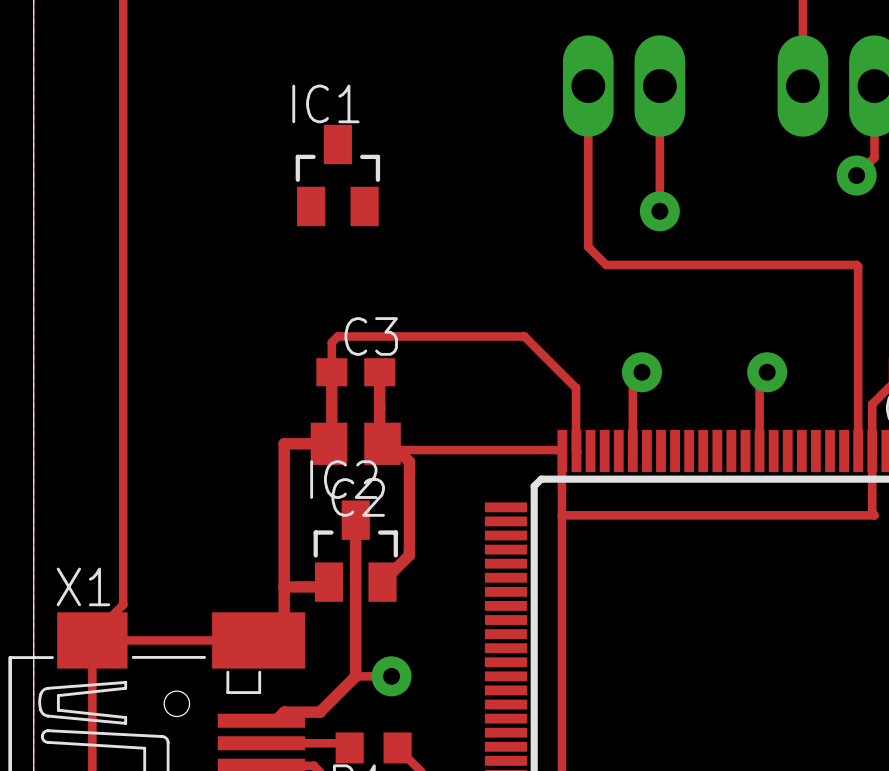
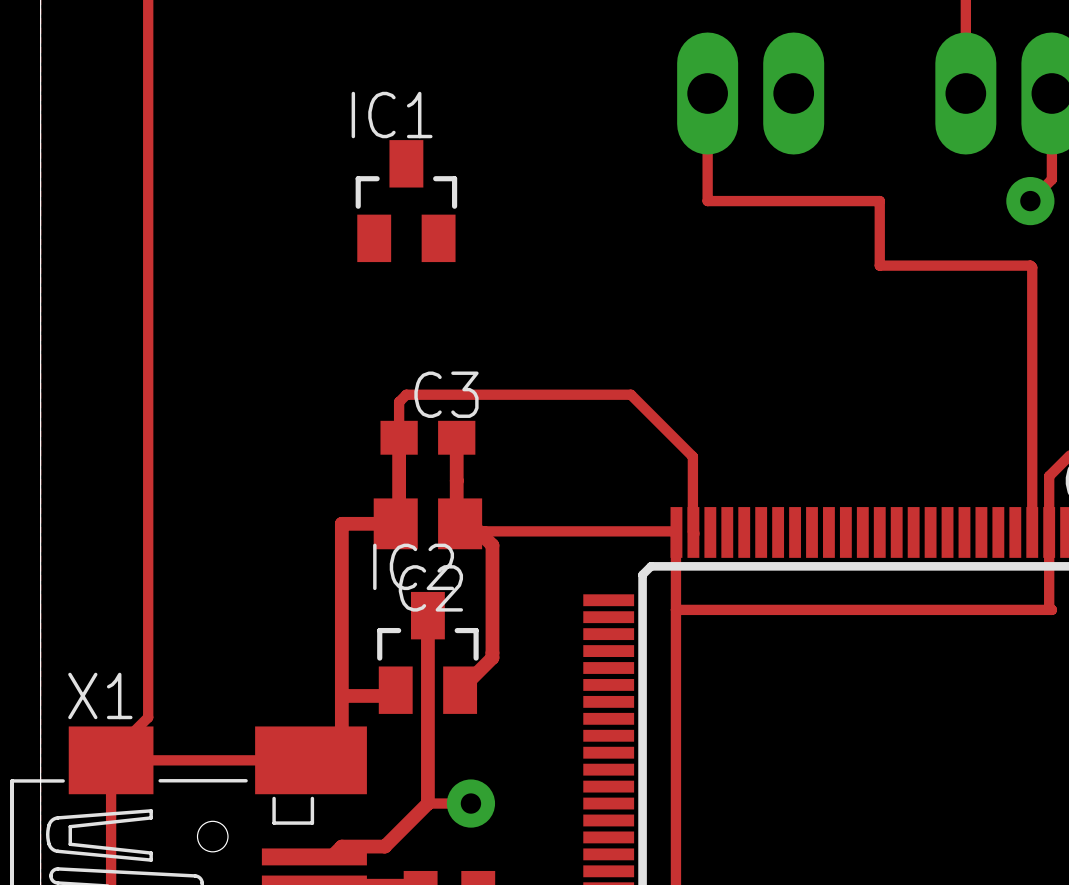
track: (659, 86) (659, 211) -> none
track: (588, 175) (588, 247) (606, 264) (856, 264) (858, 266) -> (707, 201) (879, 201) (879, 265) (1030, 265) (1032, 267) (1032, 310)
via: (659, 211) -> none
track: (641, 372) (632, 381) (632, 450) -> none
via: (641, 372) -> none
track: (767, 372) (759, 379) (759, 450) -> none
via: (767, 372) -> none

